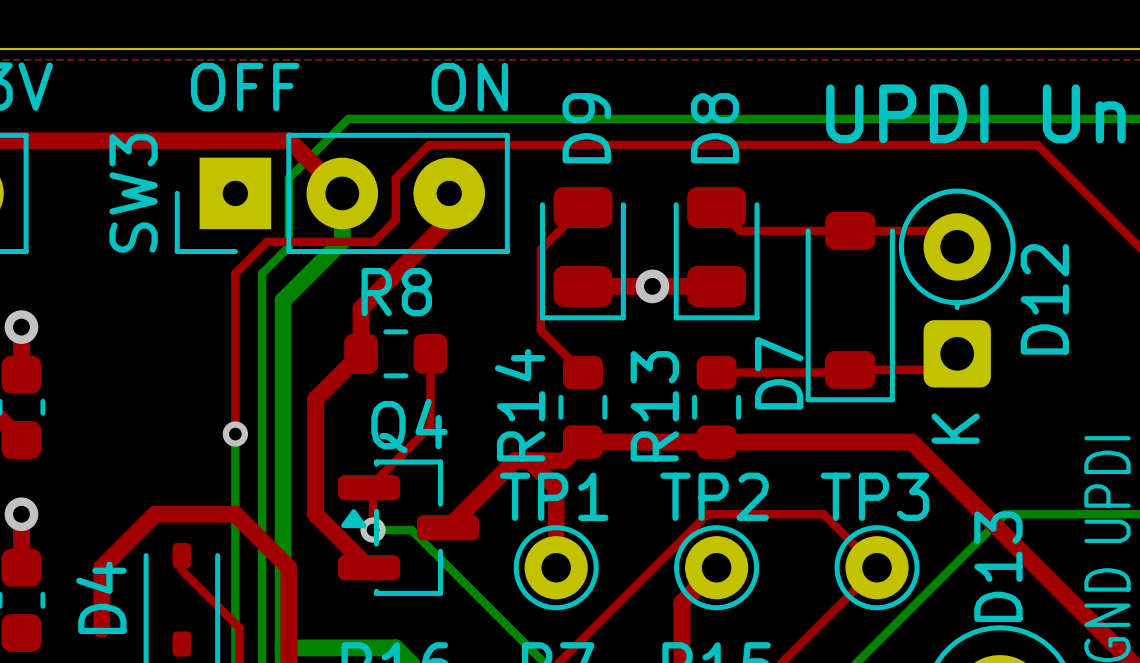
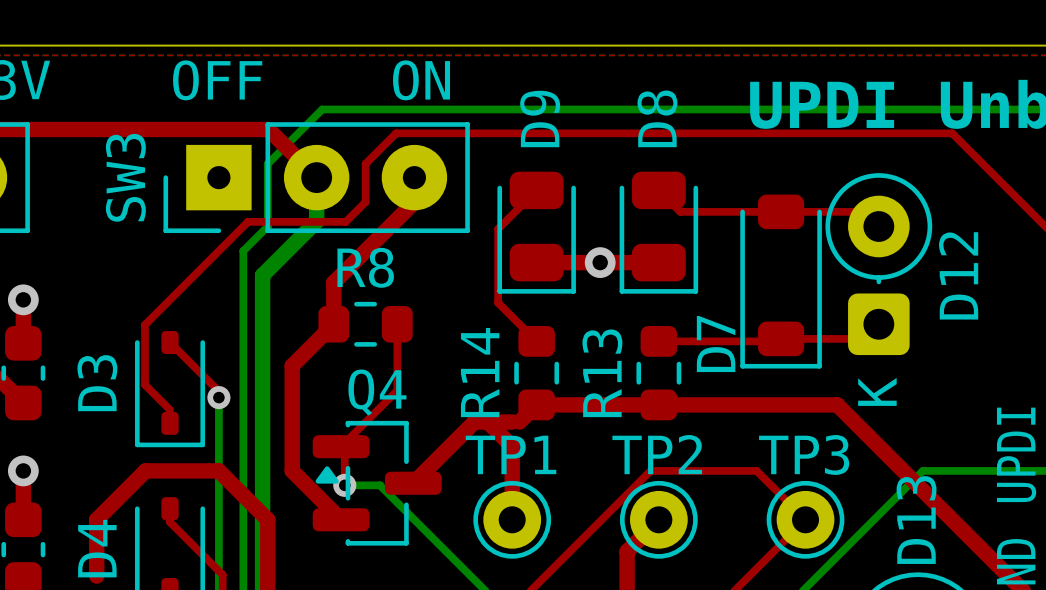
top track: (235, 273) (235, 427) -> (218, 250) (145, 324) (145, 384) (170, 409)
top track: none -> (170, 342) (218, 391)
D3: none -> (170, 389)

